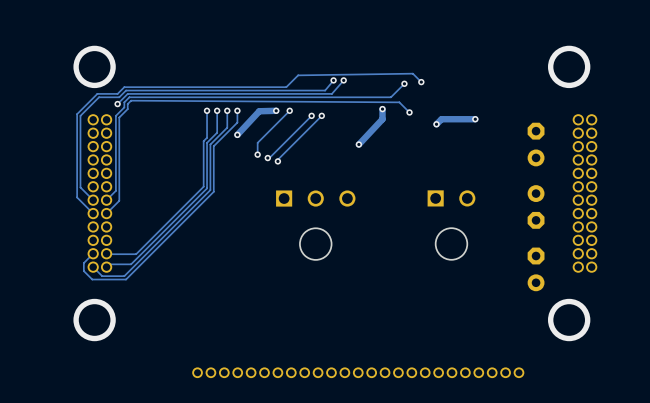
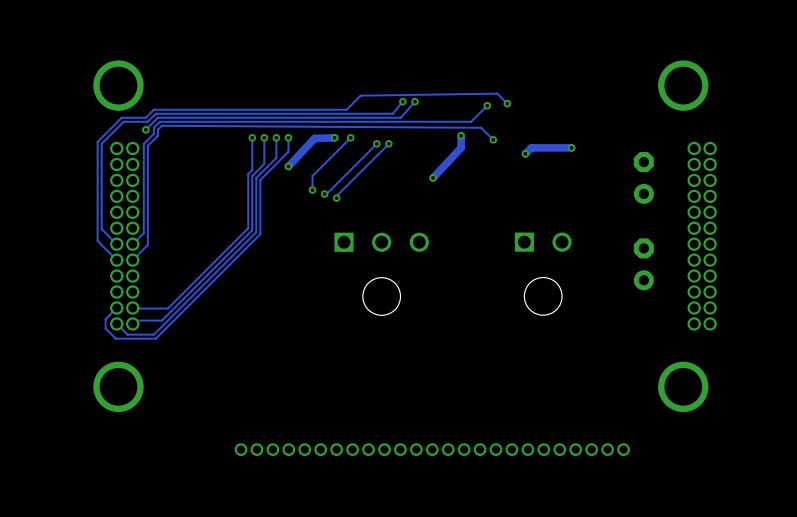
part rotation: 0° (536, 206) -> 180° (643, 264)
part: (536, 269) -> none

